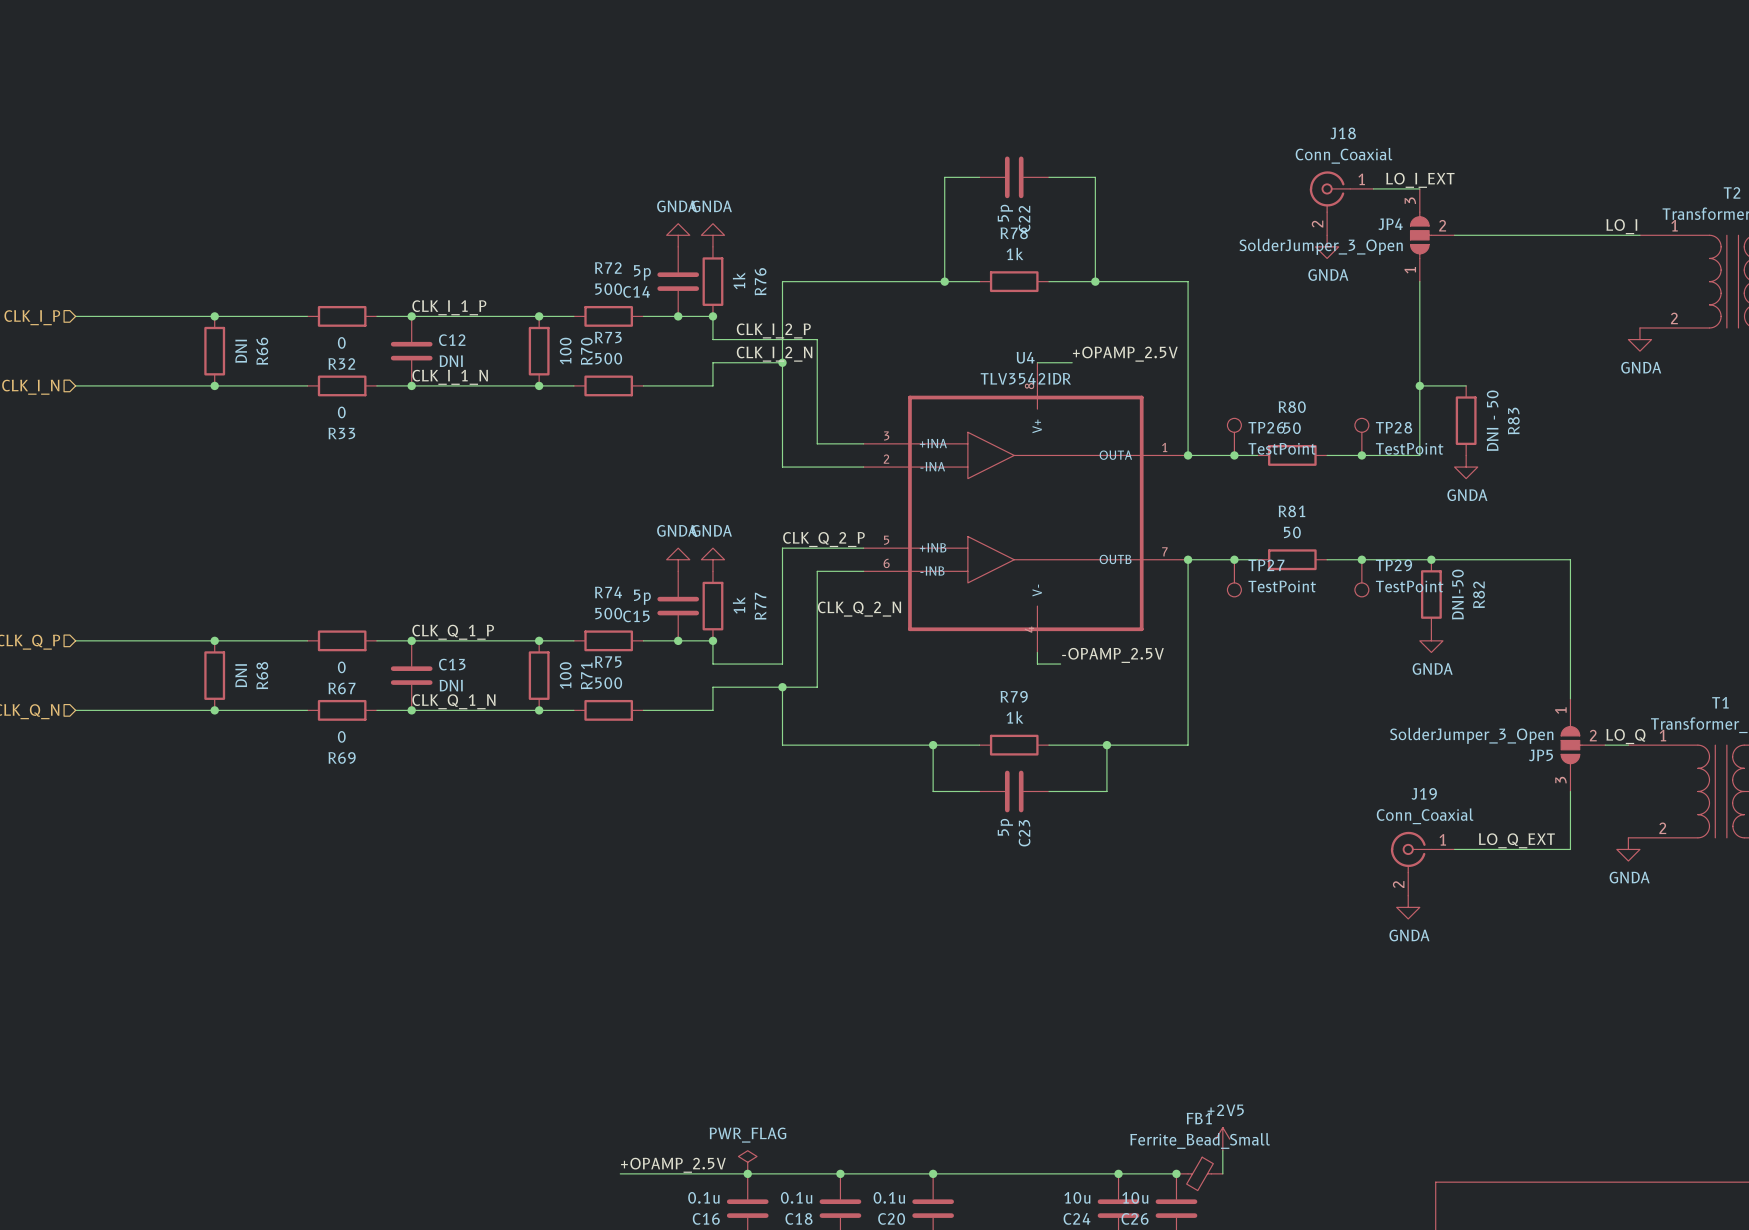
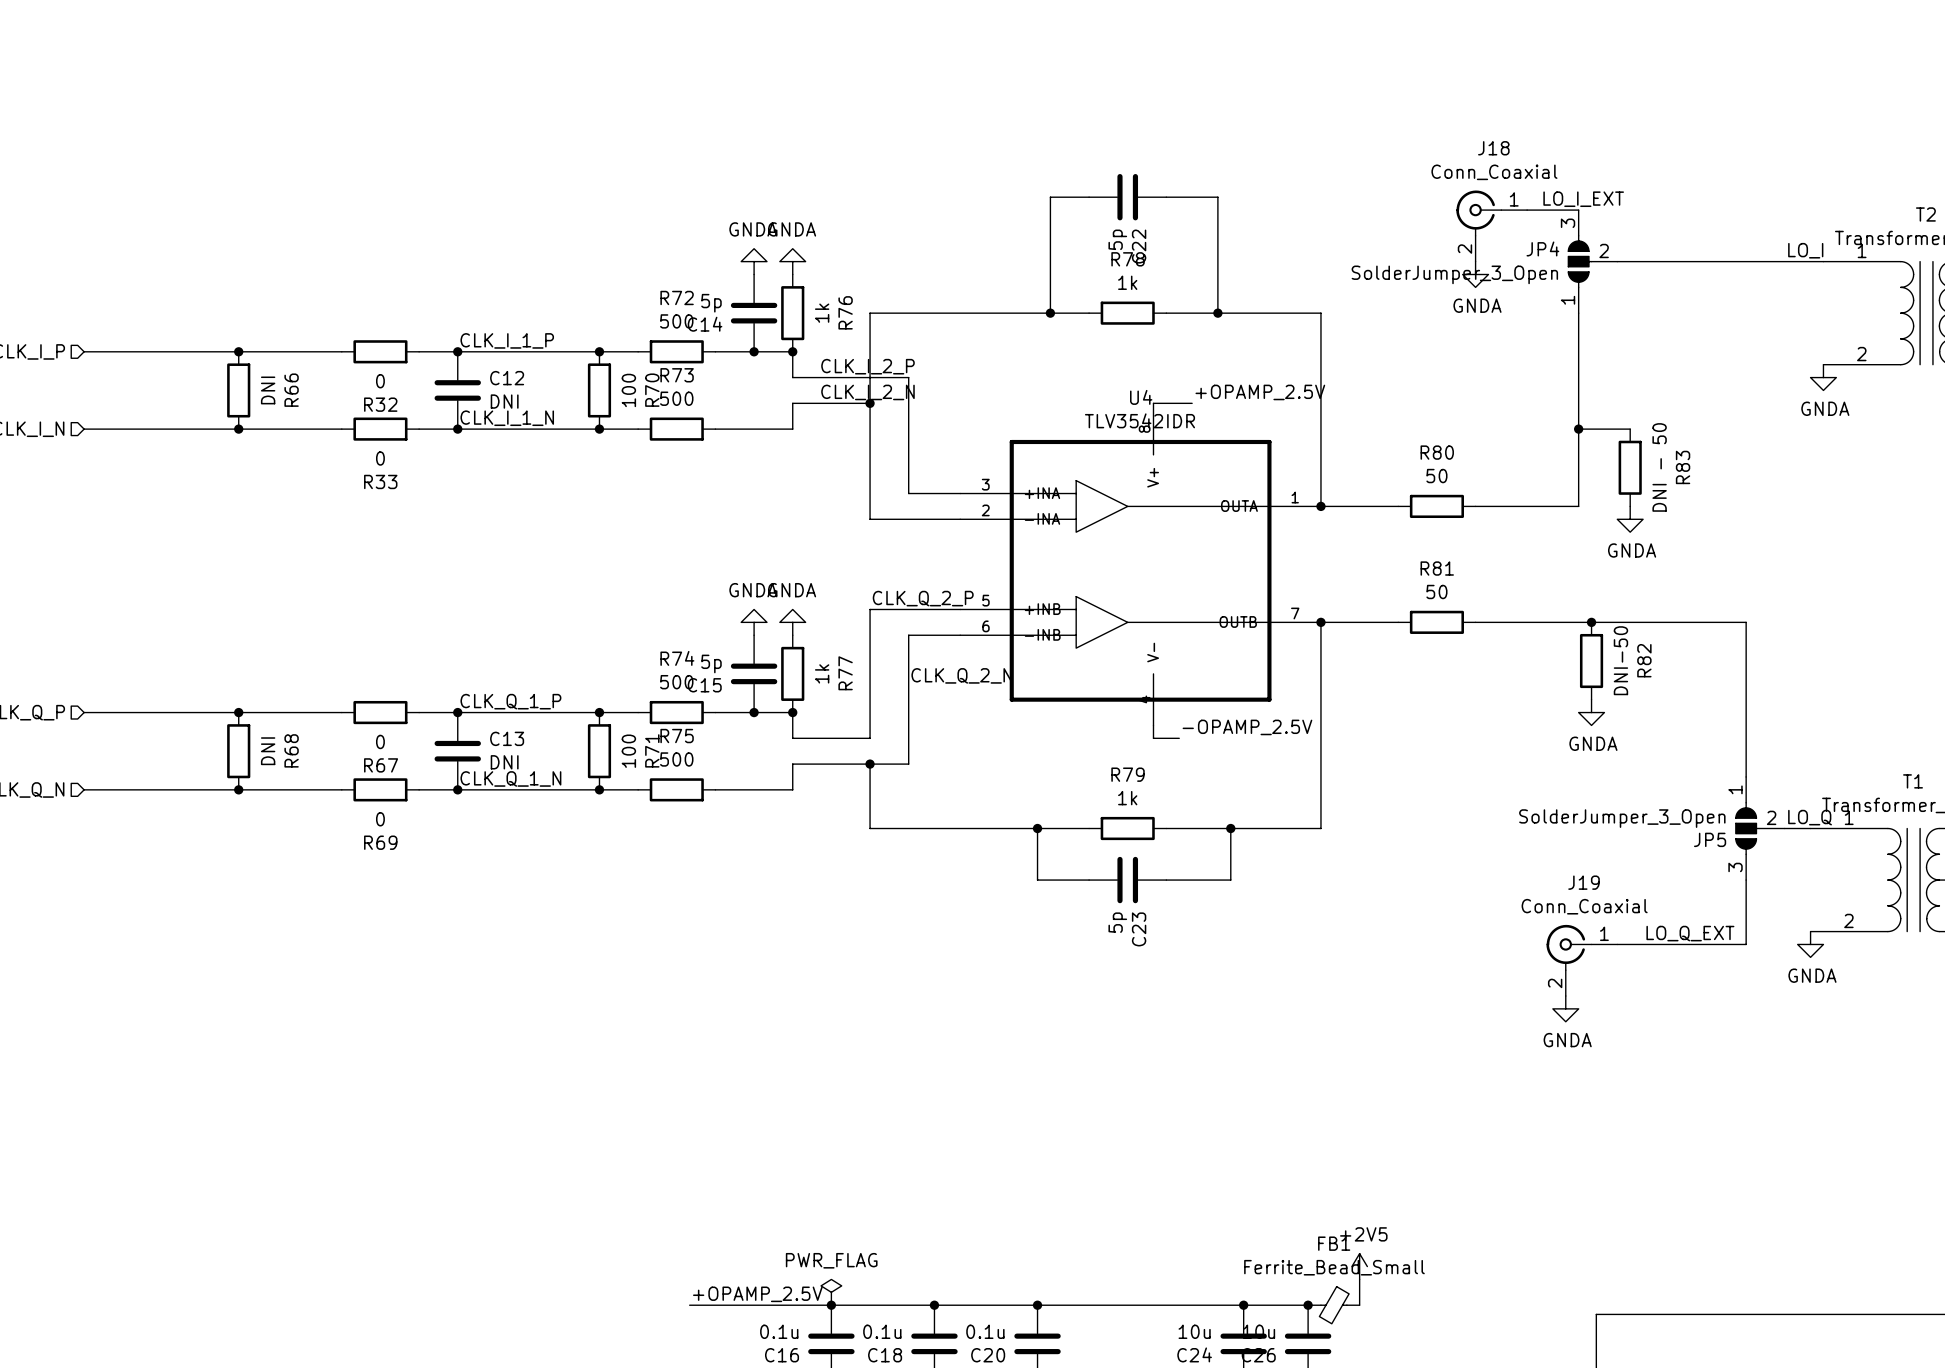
TP26: TestPoint (1234, 436) -> none
TP28: TestPoint (1361, 436) -> none
junction: (1234, 455) -> none
junction: (1361, 455) -> none
junction: (1234, 559) -> none
junction: (1361, 559) -> none
TP27: TestPoint (1234, 578) -> none
TP29: TestPoint (1361, 578) -> none

